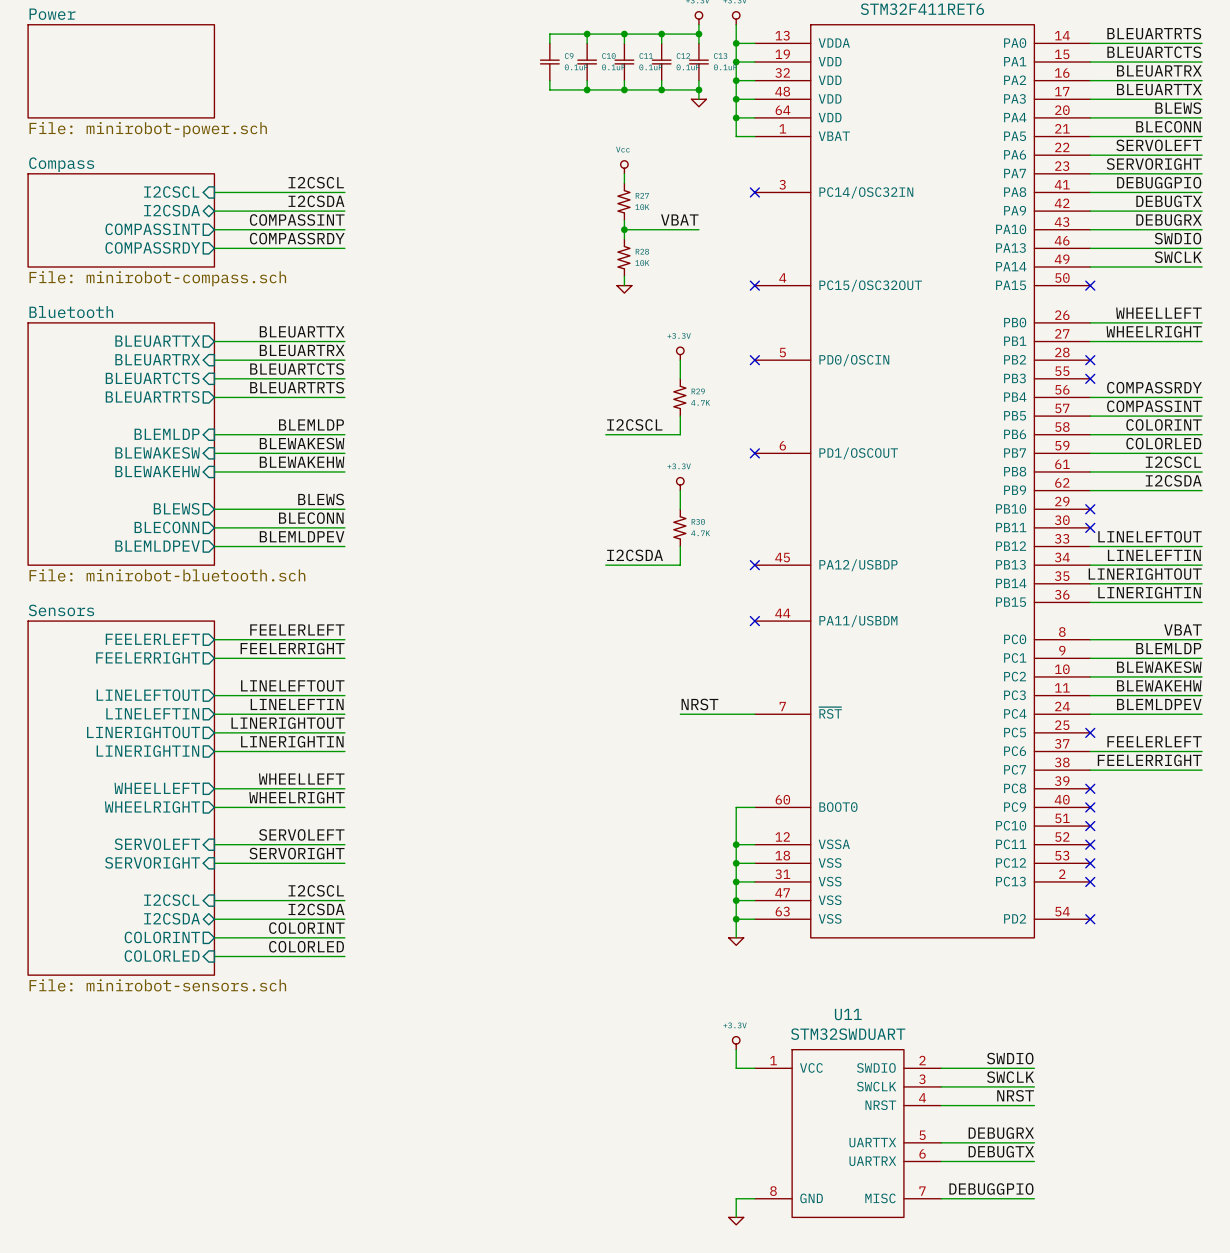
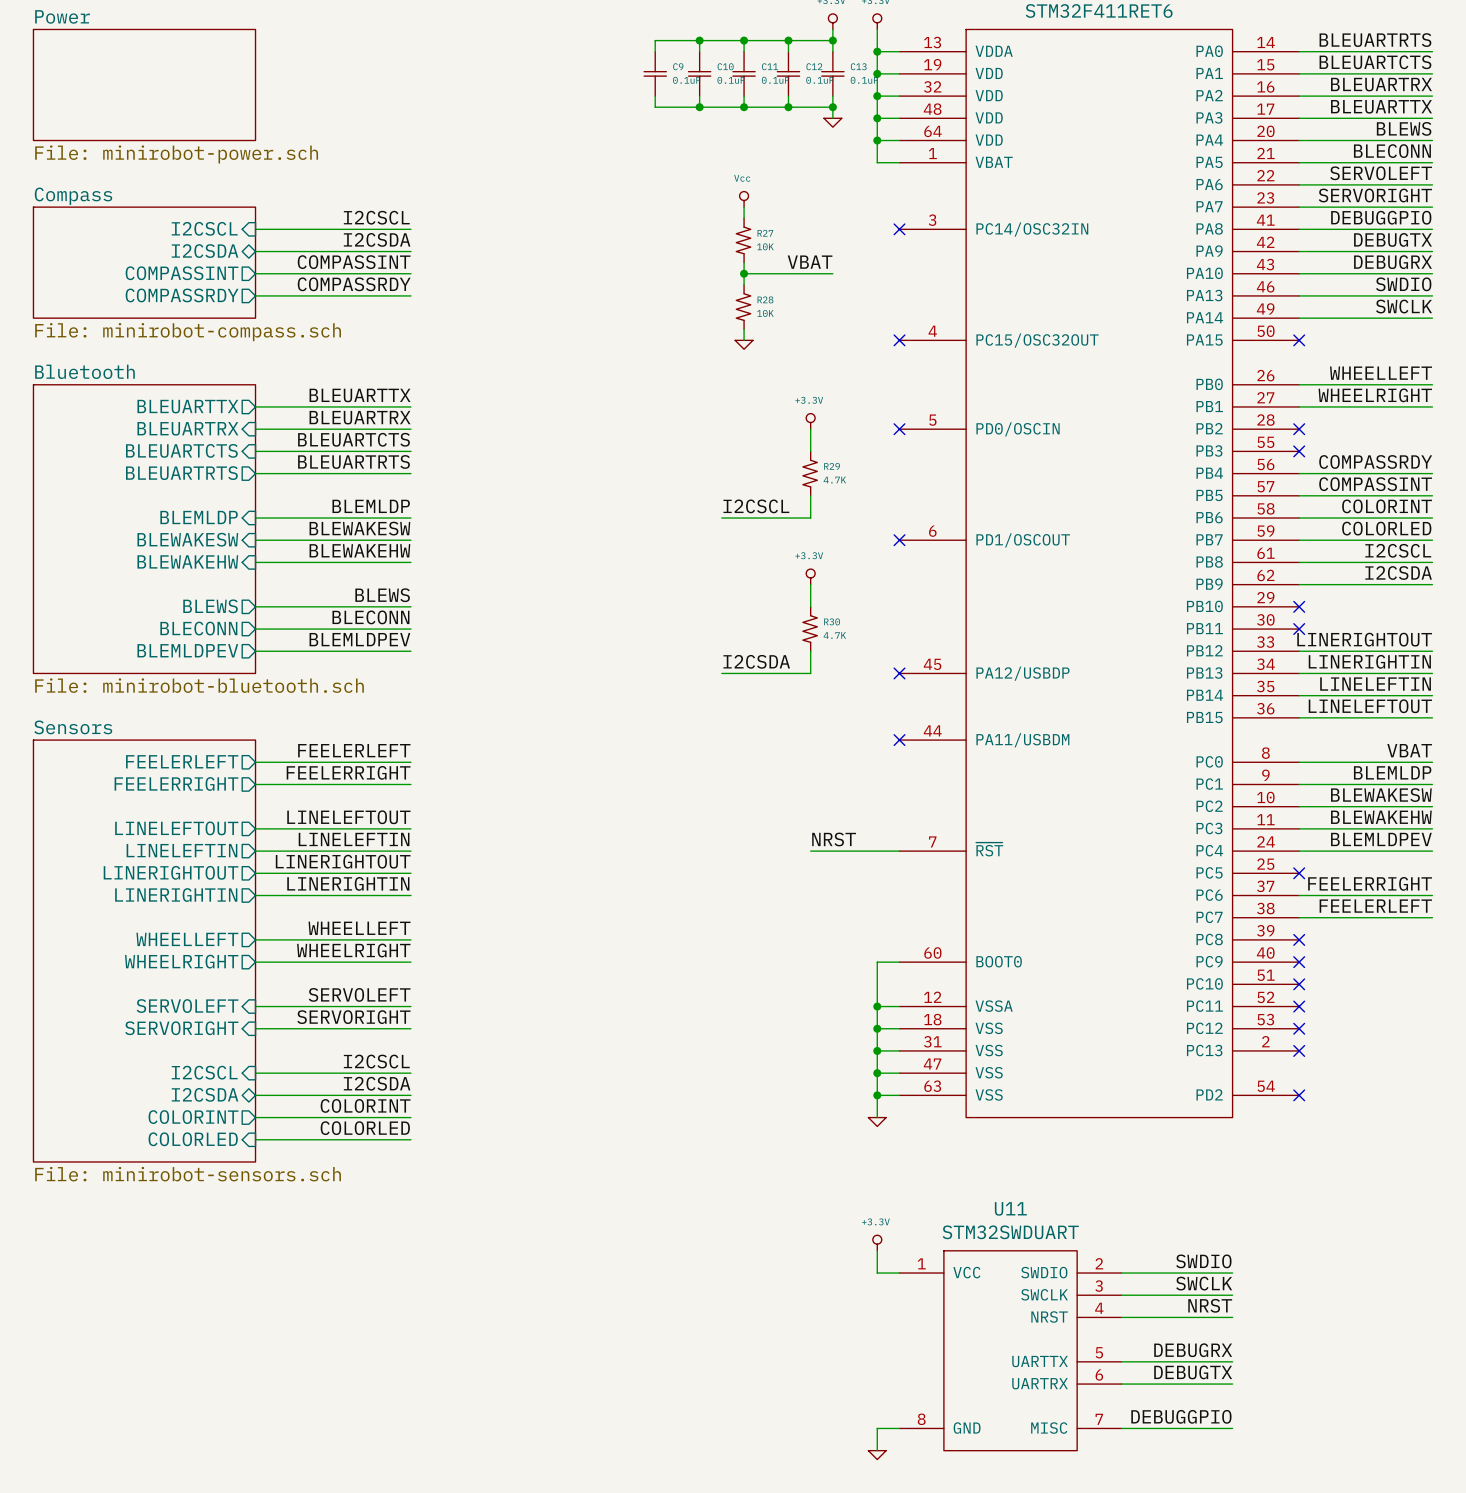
label: LINELEFTOUT (1149, 536) -> LINERIGHTOUT (1364, 639)
label: LINELEFTIN (1154, 555) -> LINERIGHTIN (1369, 661)
label: LINERIGHTOUT (1145, 574) -> LINELEFTIN (1375, 684)
label: LINERIGHTIN (1149, 592) -> LINELEFTOUT (1370, 706)
label: FEELERLEFT (1154, 741) -> FEELERRIGHT (1370, 883)
label: FEELERRIGHT (1149, 760) -> FEELERLEFT (1375, 906)

